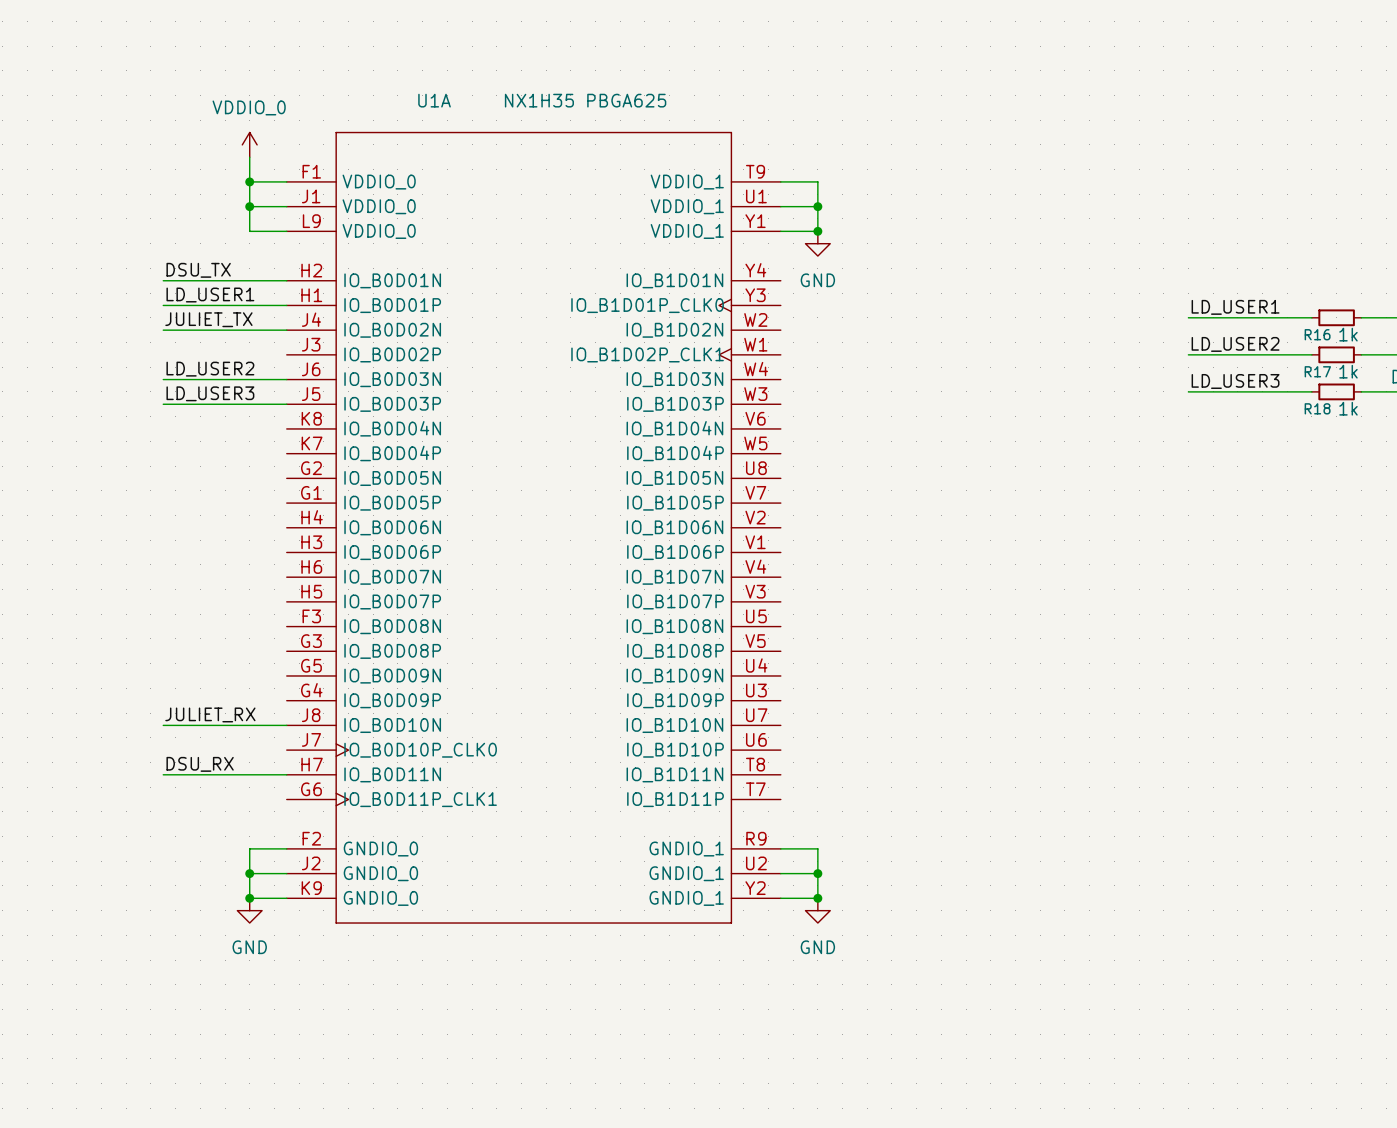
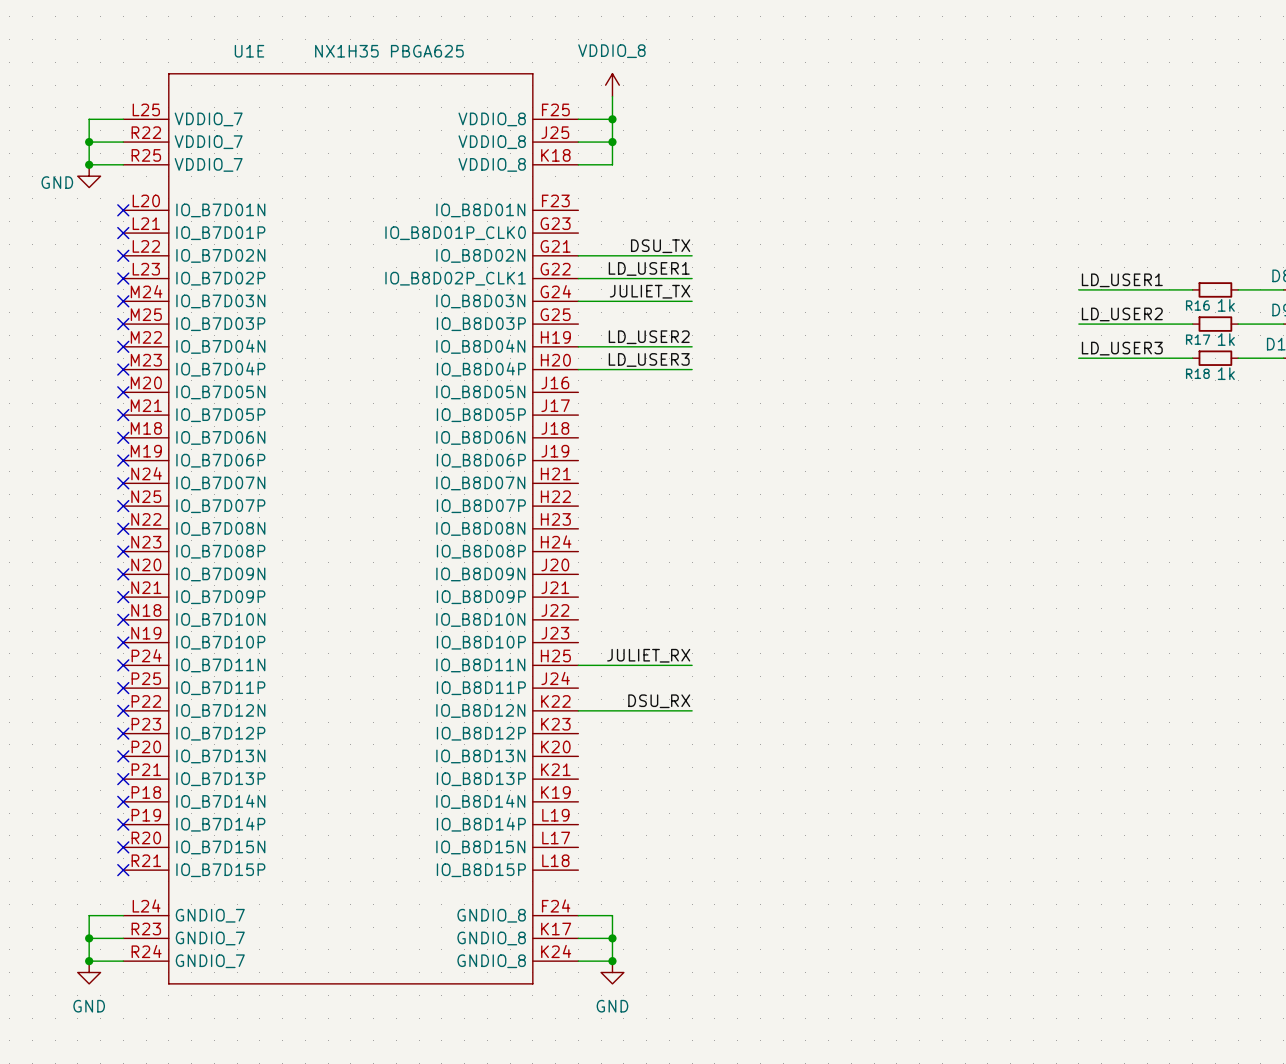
power symbol: none -> VDDIO_8 (612, 85)
wire: none -> (612, 96) (612, 164) (578, 164)
wire: none -> (123, 119) (89, 119) (89, 164) (123, 164)
junction: none -> (612, 119)
power symbol: VDDIO_0 (249, 144) -> none
junction: none -> (89, 142)
wire: (249, 157) (249, 231) (286, 231) -> none
junction: none -> (612, 142)
junction: none -> (89, 164)
wire: (249, 181) (286, 181) -> none
junction: (249, 181) -> none
wire: (780, 181) (817, 181) (817, 231) (780, 231) -> none
power symbol: none -> GND (89, 176)
wire: (249, 206) (286, 206) -> (89, 142) (123, 142)
junction: (249, 206) -> none
wire: (780, 206) (817, 206) -> (578, 142) (612, 142)
junction: (817, 206) -> none
no-connect mark: none -> (123, 210)
junction: (817, 231) -> none
power symbol: GND (817, 243) -> none
no-connect mark: none -> (123, 233)
label: DSU_TX (198, 270) -> none
label: none -> DSU_TX (660, 246)
no-connect mark: none -> (123, 255)
wire: (163, 280) (286, 280) -> none
wire: none -> (578, 255) (692, 255)
label: LD_USER1 (210, 295) -> none
label: none -> LD_USER1 (649, 268)
no-connect mark: none -> (123, 278)
wire: (163, 305) (286, 305) -> none
wire: none -> (578, 278) (692, 278)
label: JULIET_TX (208, 319) -> none
label: none -> JULIET_TX (650, 291)
no-connect mark: none -> (123, 301)
wire: (163, 330) (286, 330) -> none
wire: none -> (578, 301) (692, 301)
no-connect mark: none -> (123, 324)
label: LD_USER2 (210, 369) -> none
label: none -> LD_USER2 (649, 337)
no-connect mark: none -> (123, 346)
wire: (163, 379) (286, 379) -> none
wire: none -> (578, 346) (692, 346)
label: LD_USER3 (210, 393) -> none
label: none -> LD_USER3 (649, 359)
no-connect mark: none -> (123, 369)
wire: (163, 404) (286, 404) -> none
wire: none -> (578, 369) (692, 369)
no-connect mark: none -> (123, 392)
no-connect mark: none -> (123, 415)
no-connect mark: none -> (123, 437)
no-connect mark: none -> (123, 460)
no-connect mark: none -> (123, 483)
U1A: NX1H35 PBGA625 (533, 527) -> none
no-connect mark: none -> (123, 506)
no-connect mark: none -> (123, 528)
U1E: none -> NX1H35 PBGA625 (350, 528)
no-connect mark: none -> (123, 551)
no-connect mark: none -> (123, 574)
no-connect mark: none -> (123, 597)
no-connect mark: none -> (123, 619)
no-connect mark: none -> (123, 642)
label: JULIET_RX (210, 714) -> none
label: none -> JULIET_RX (648, 655)
no-connect mark: none -> (123, 665)
wire: (163, 725) (286, 725) -> none
wire: none -> (578, 665) (692, 665)
no-connect mark: none -> (123, 688)
label: DSU_RX (200, 764) -> none
label: none -> DSU_RX (659, 701)
no-connect mark: none -> (123, 710)
wire: (163, 774) (286, 774) -> none
wire: none -> (578, 710) (692, 710)
no-connect mark: none -> (123, 733)
no-connect mark: none -> (123, 756)
no-connect mark: none -> (123, 779)
wire: (286, 848) (249, 848) (249, 898) (286, 898) -> (123, 915) (89, 915) (89, 961) (123, 961)
wire: (780, 848) (817, 848) (817, 898) (780, 898) -> (578, 915) (612, 915) (612, 961) (578, 961)
no-connect mark: none -> (123, 801)
wire: (249, 873) (286, 873) -> (89, 938) (123, 938)
junction: (249, 873) -> none
wire: (780, 873) (817, 873) -> (578, 938) (612, 938)
junction: (817, 873) -> none
no-connect mark: none -> (123, 824)
junction: (249, 898) -> none
junction: (817, 898) -> none
power symbol position: GND (249, 910) -> GND (89, 972)
power symbol position: GND (817, 910) -> GND (612, 972)
no-connect mark: none -> (123, 847)
no-connect mark: none -> (123, 870)
junction: none -> (89, 938)
junction: none -> (612, 938)
junction: none -> (89, 961)
junction: none -> (612, 961)

